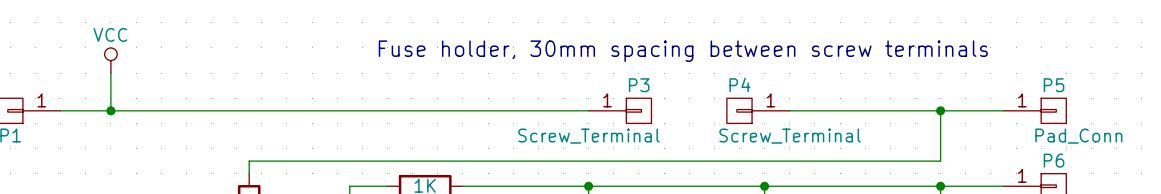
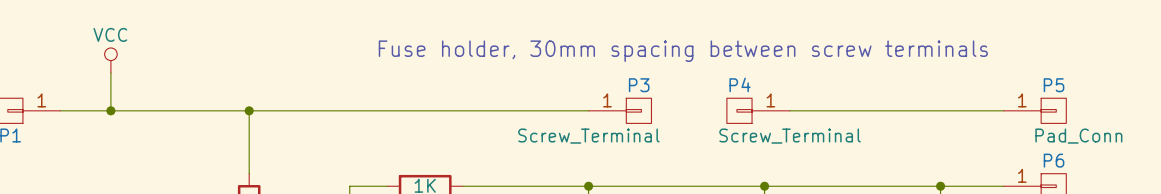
junction: none -> (249, 110)
wire: (940, 110) (940, 161) (249, 161) -> (249, 110) (249, 161)
junction: (940, 110) -> none

